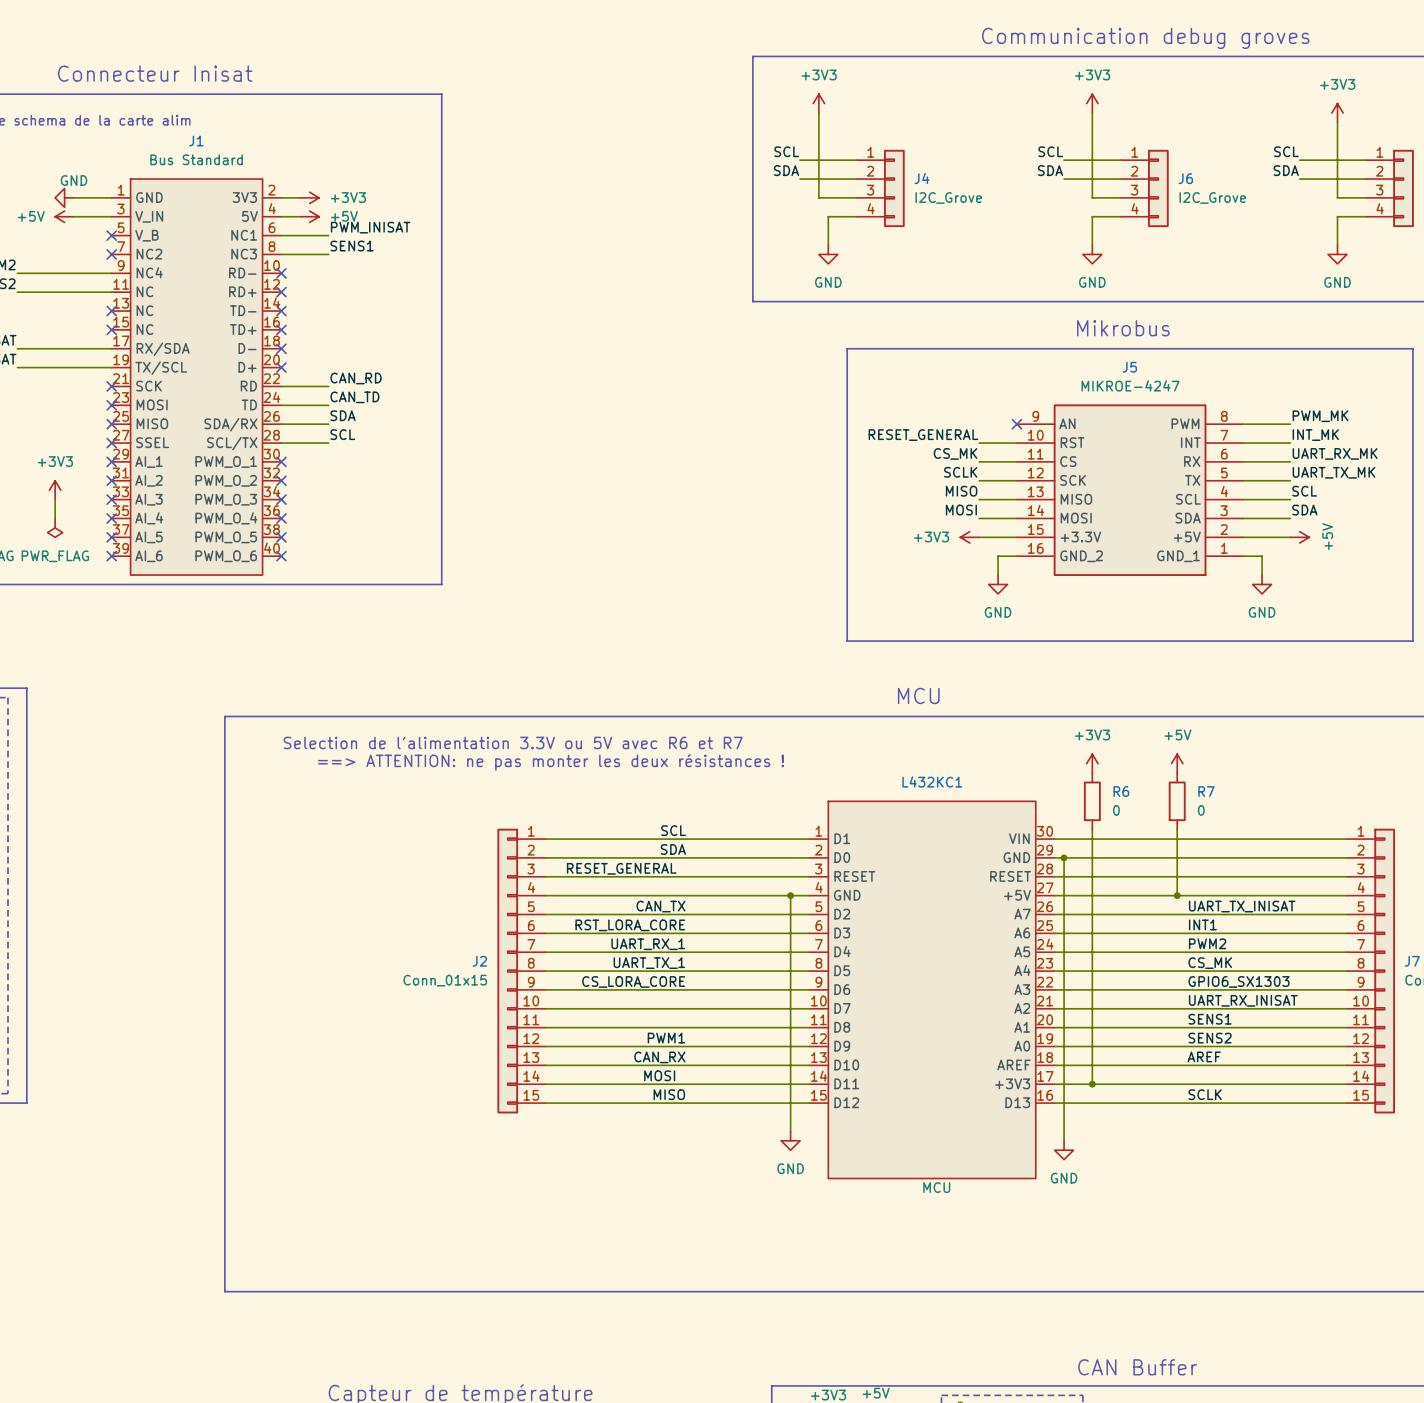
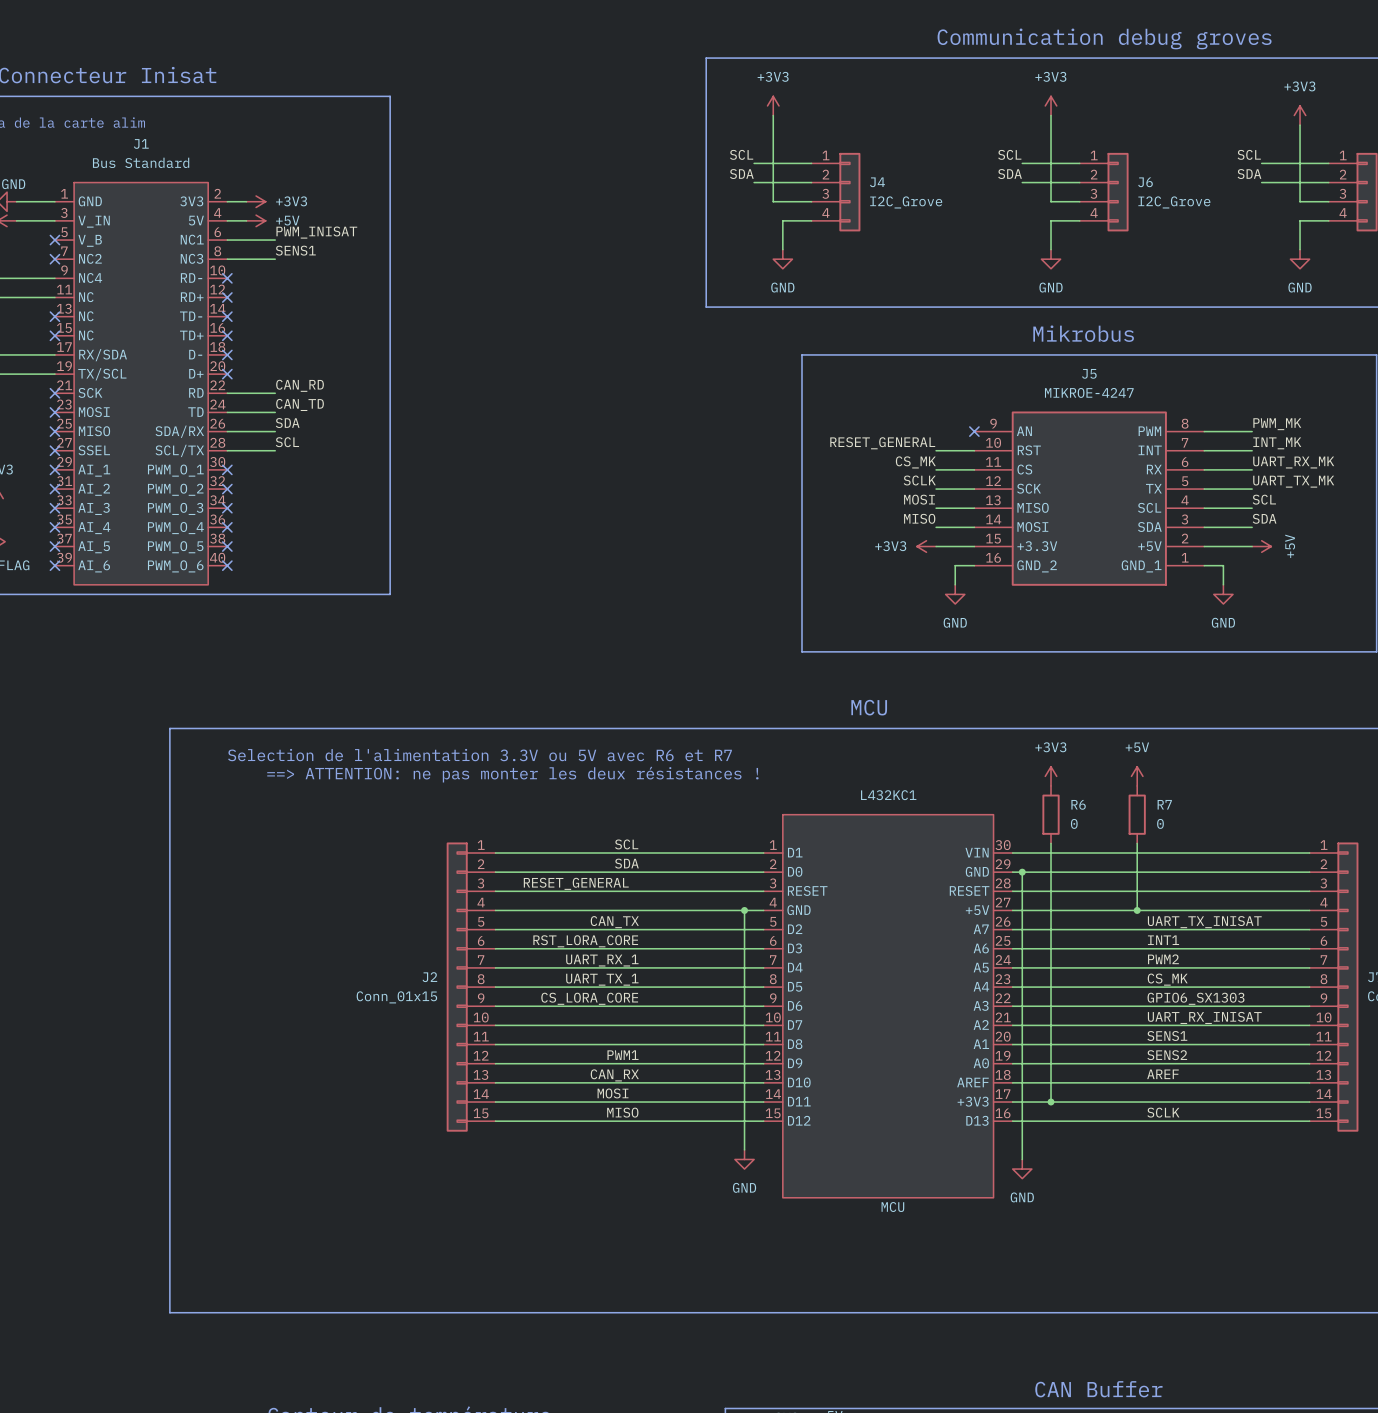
label: MISO (961, 491) -> MOSI (919, 499)
label: MOSI (961, 510) -> MISO (919, 518)

